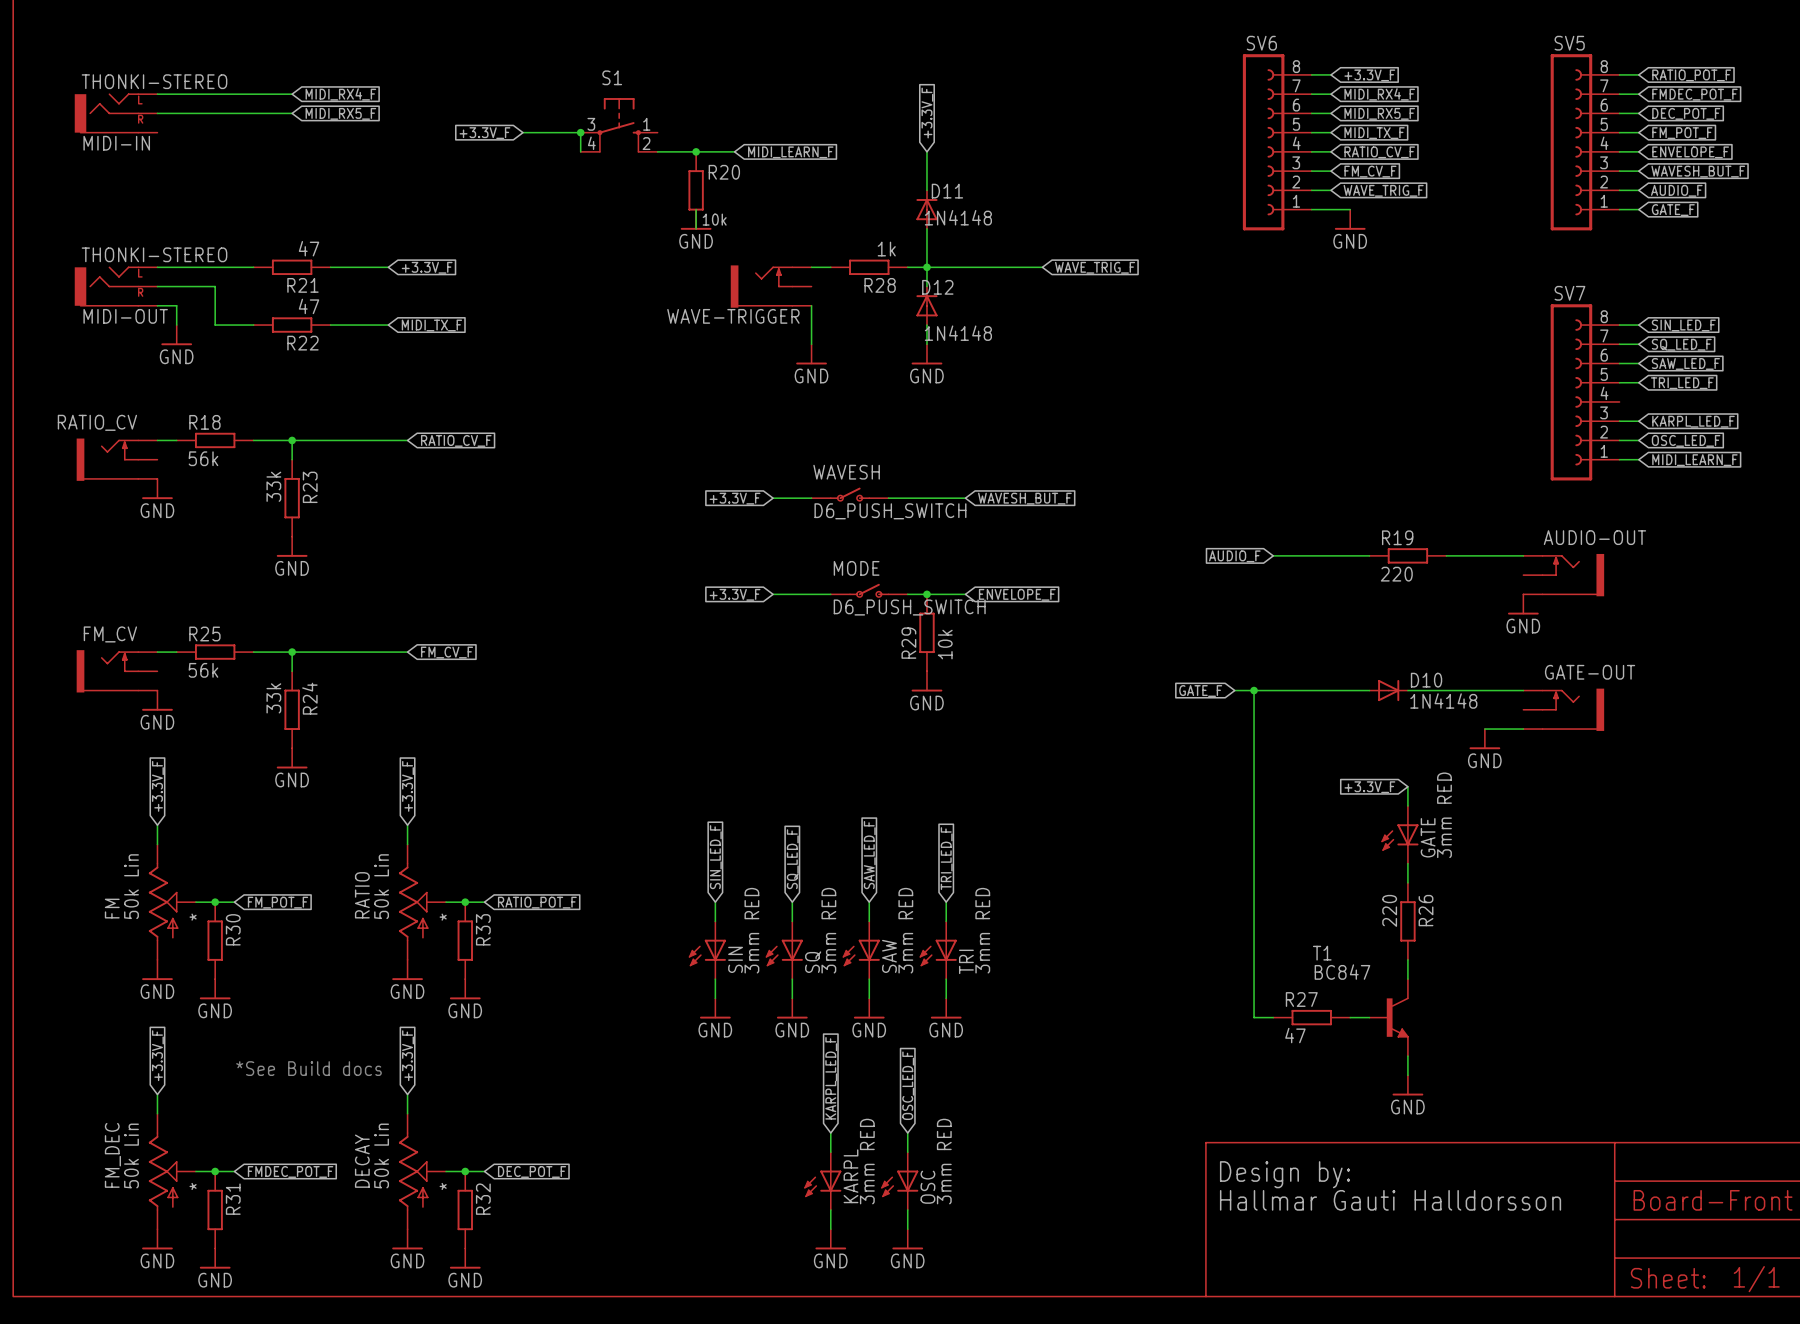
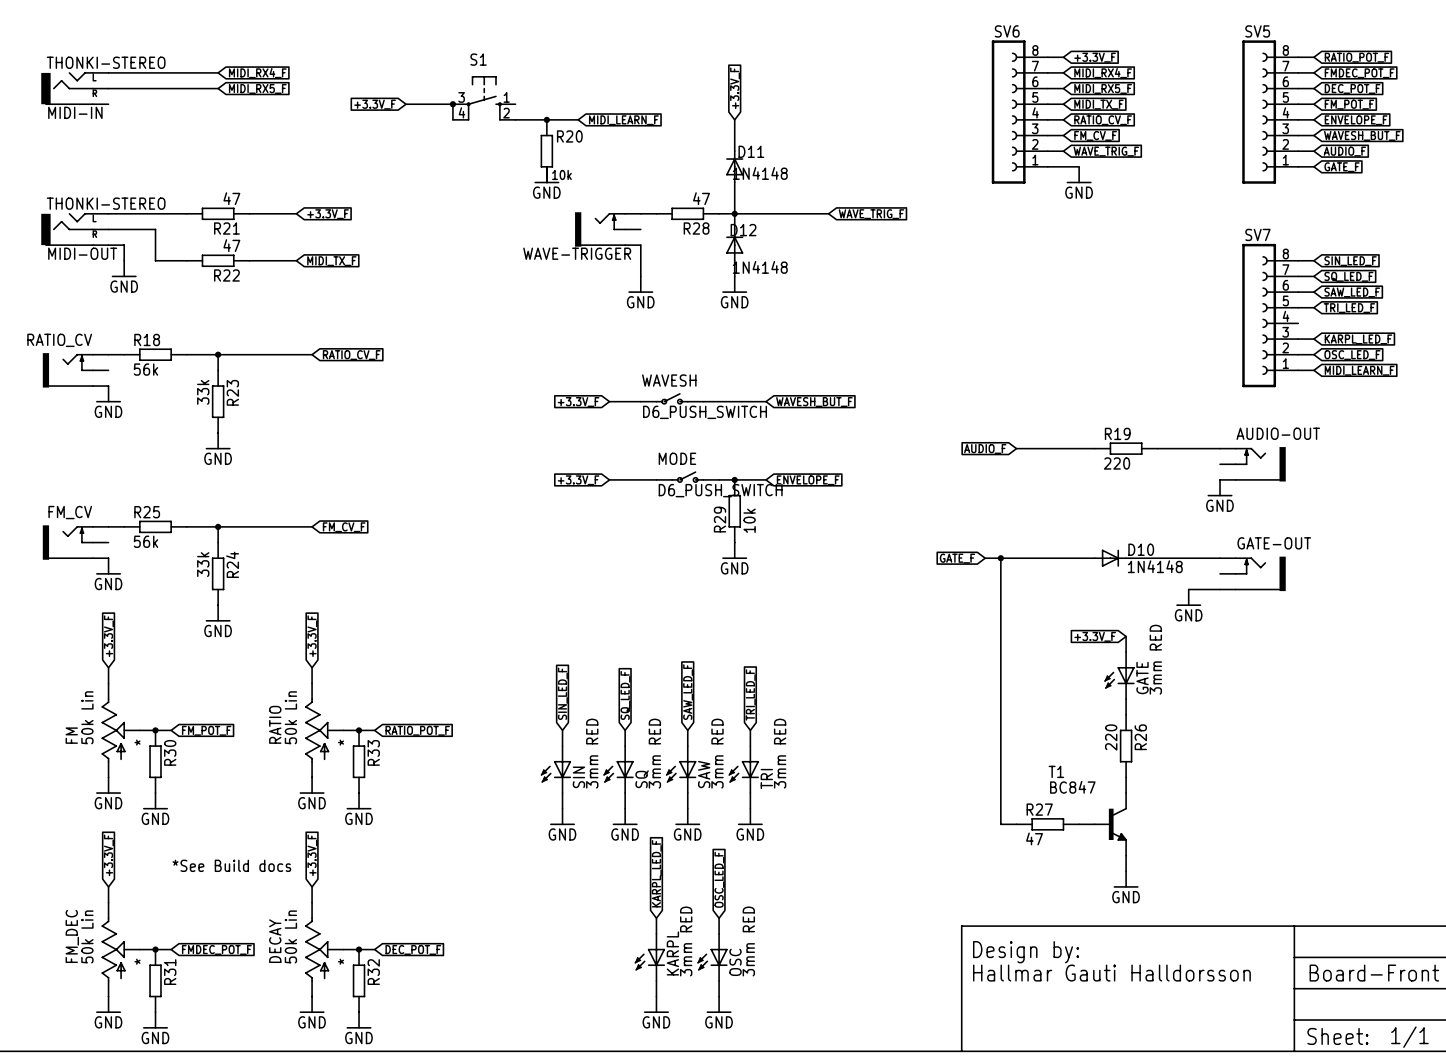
R28 value: 1k (886, 249) -> 47 (701, 198)

